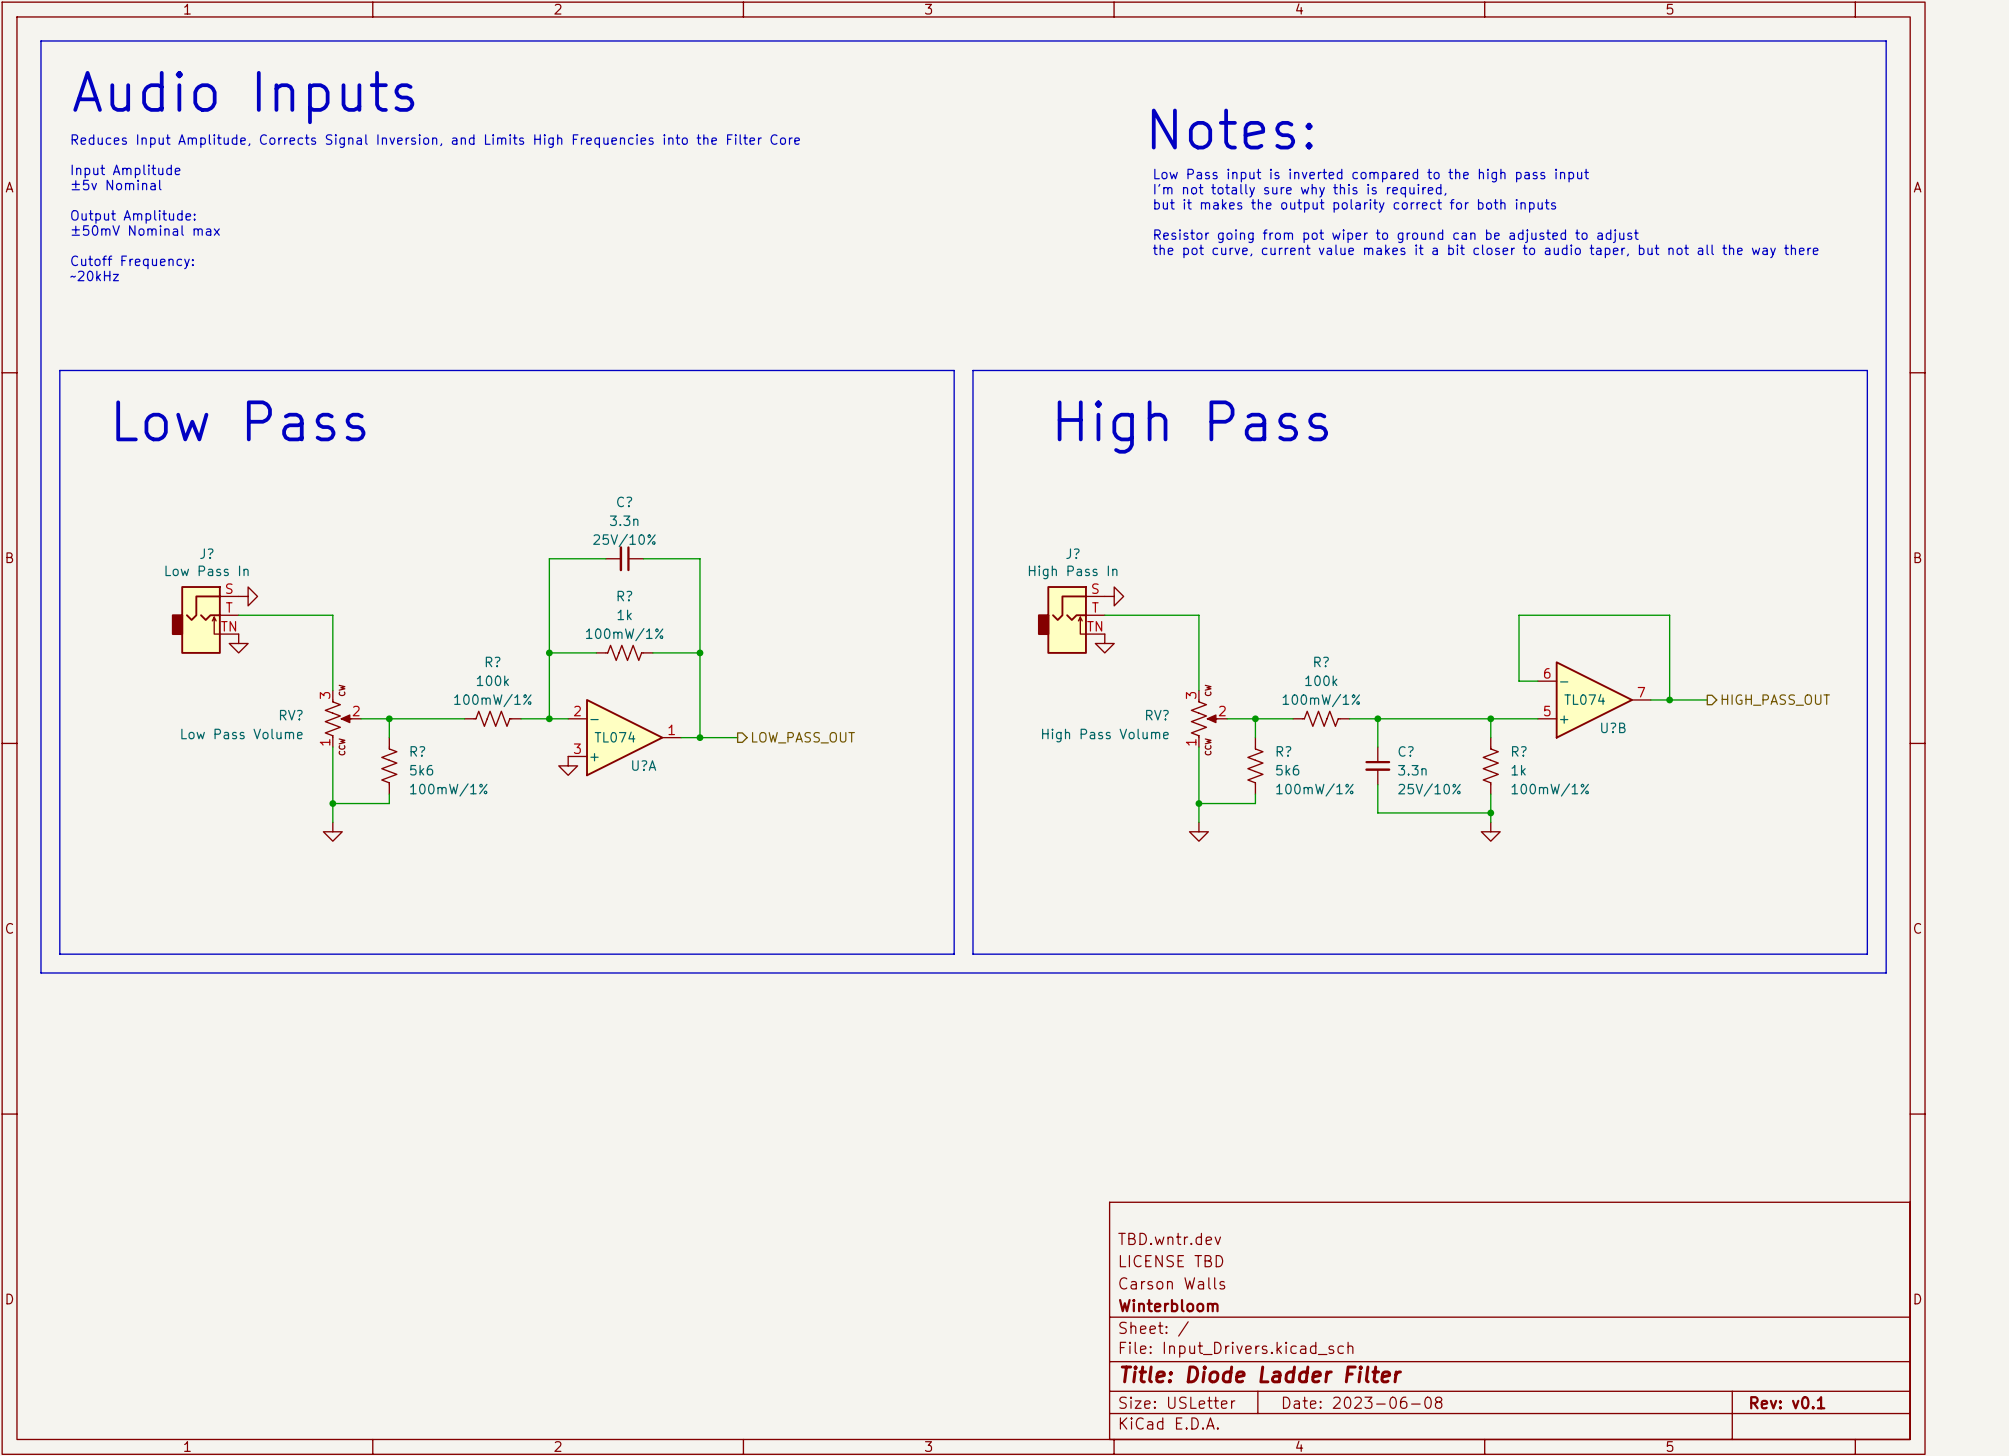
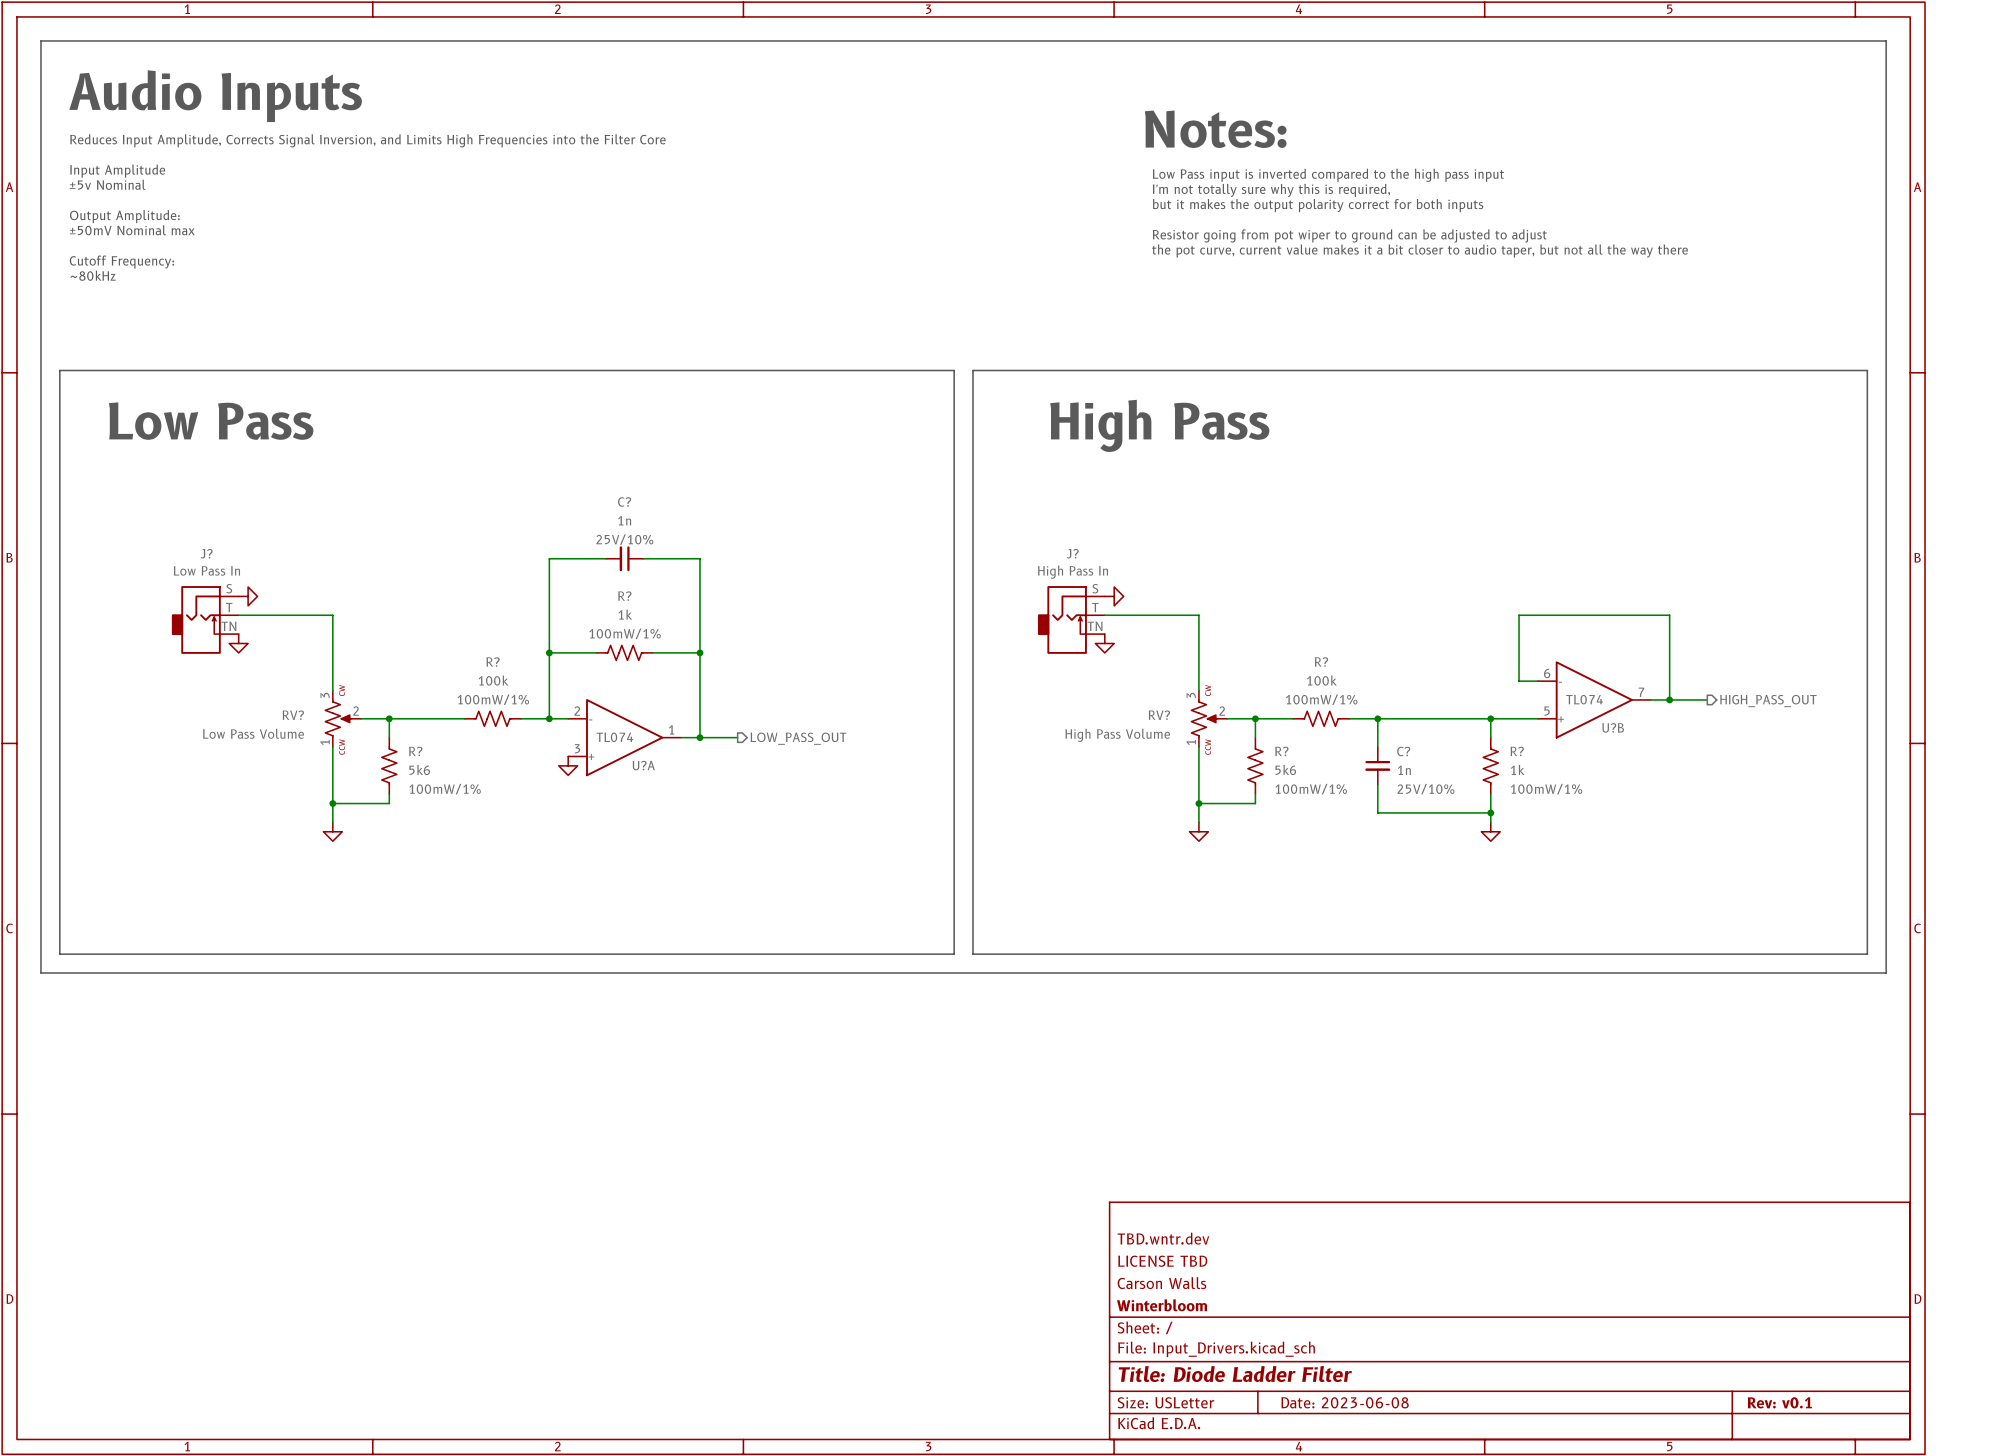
text: ~20kHz (94, 275) -> ~80kHz (93, 275)
C? value: 3.3n (624, 520) -> 1n (624, 520)
C? value: 3.3n (1412, 770) -> 1n (1404, 770)

